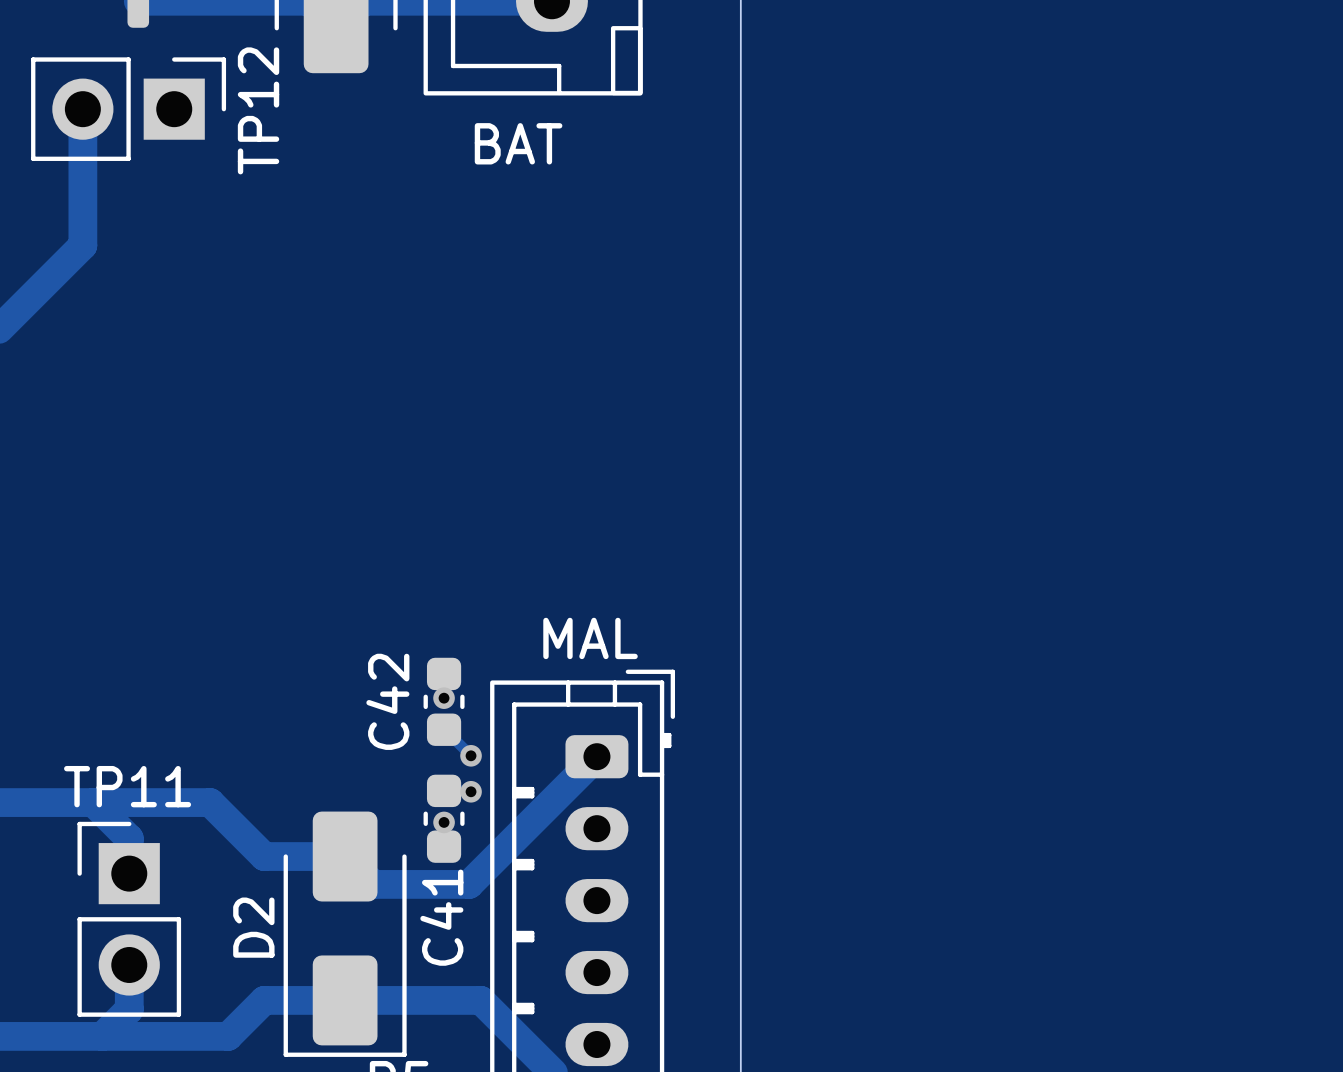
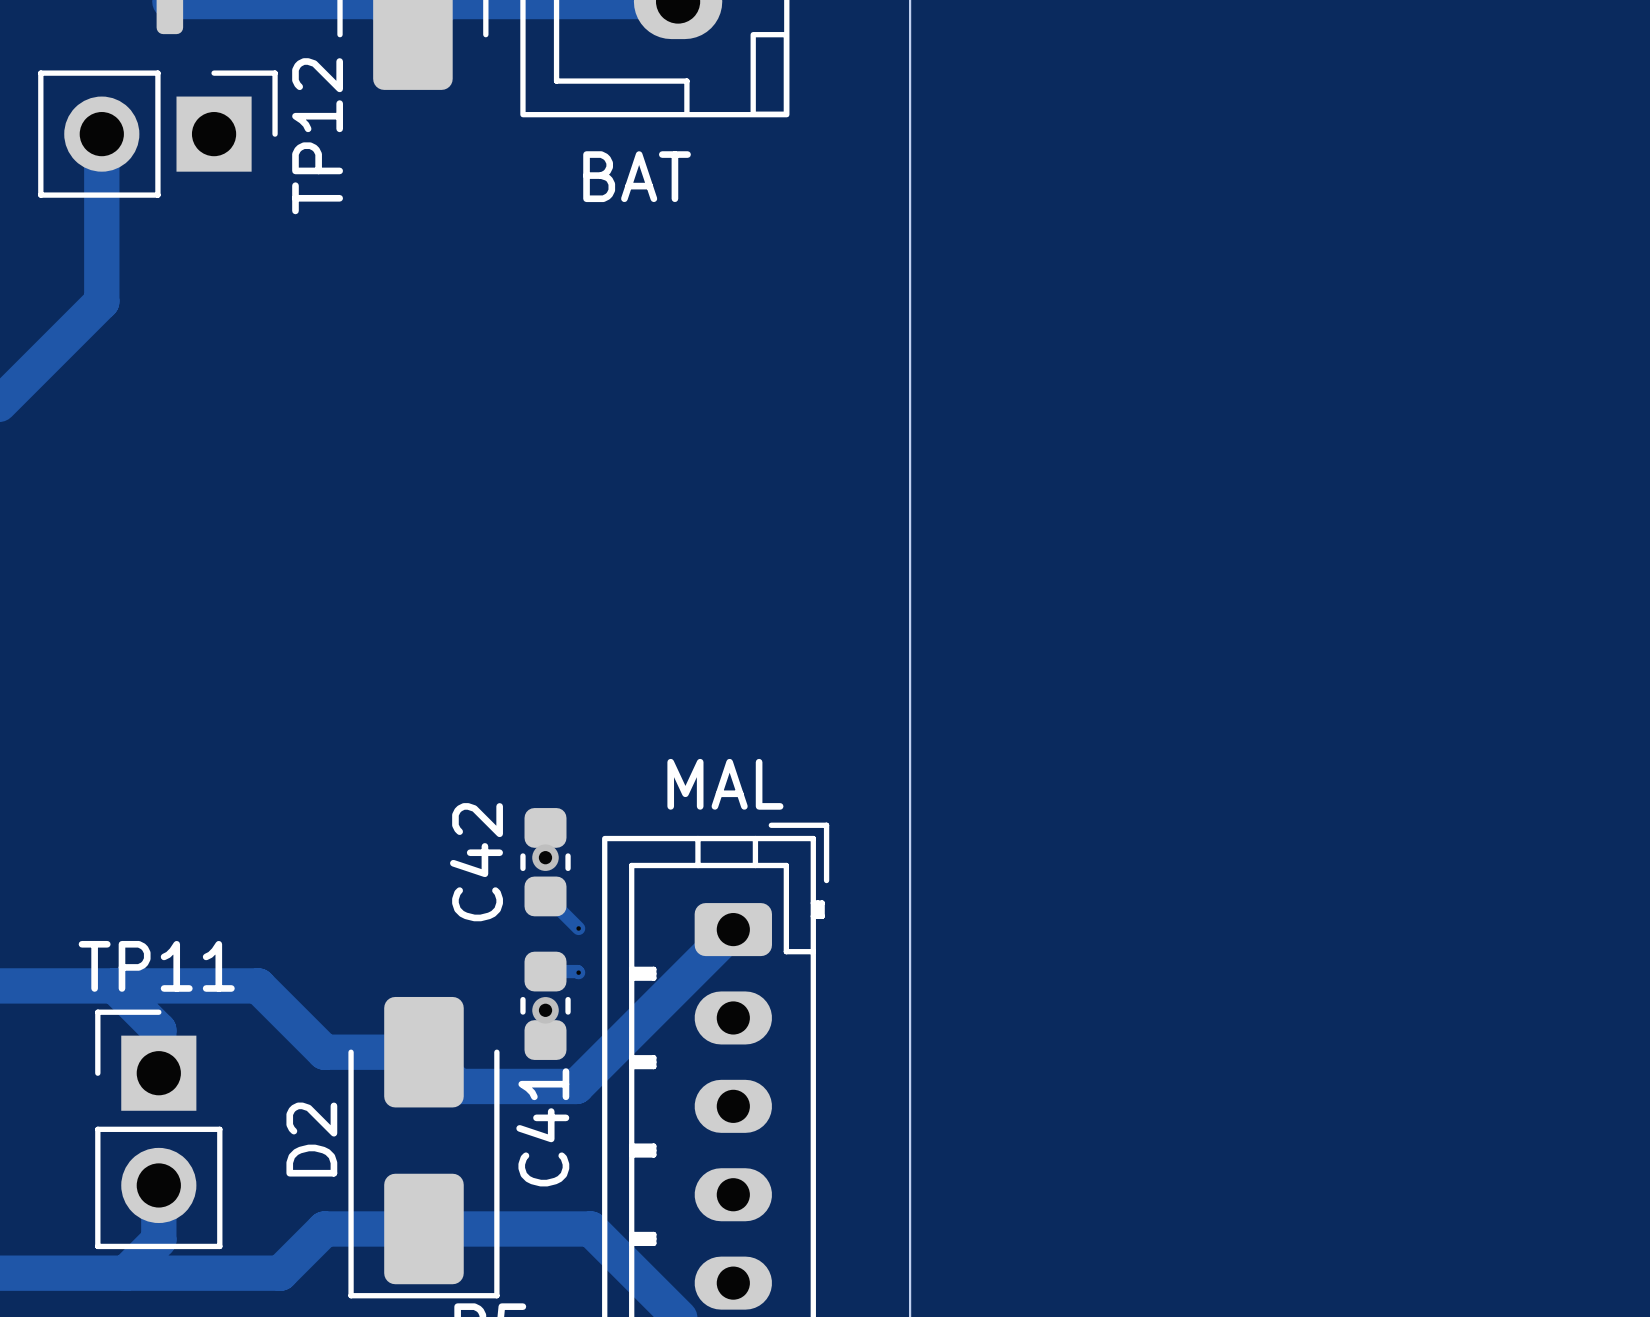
via size: [460, 745, 482, 767] -> [576, 926, 581, 931]
via size: [460, 780, 482, 803] -> [576, 970, 581, 975]

